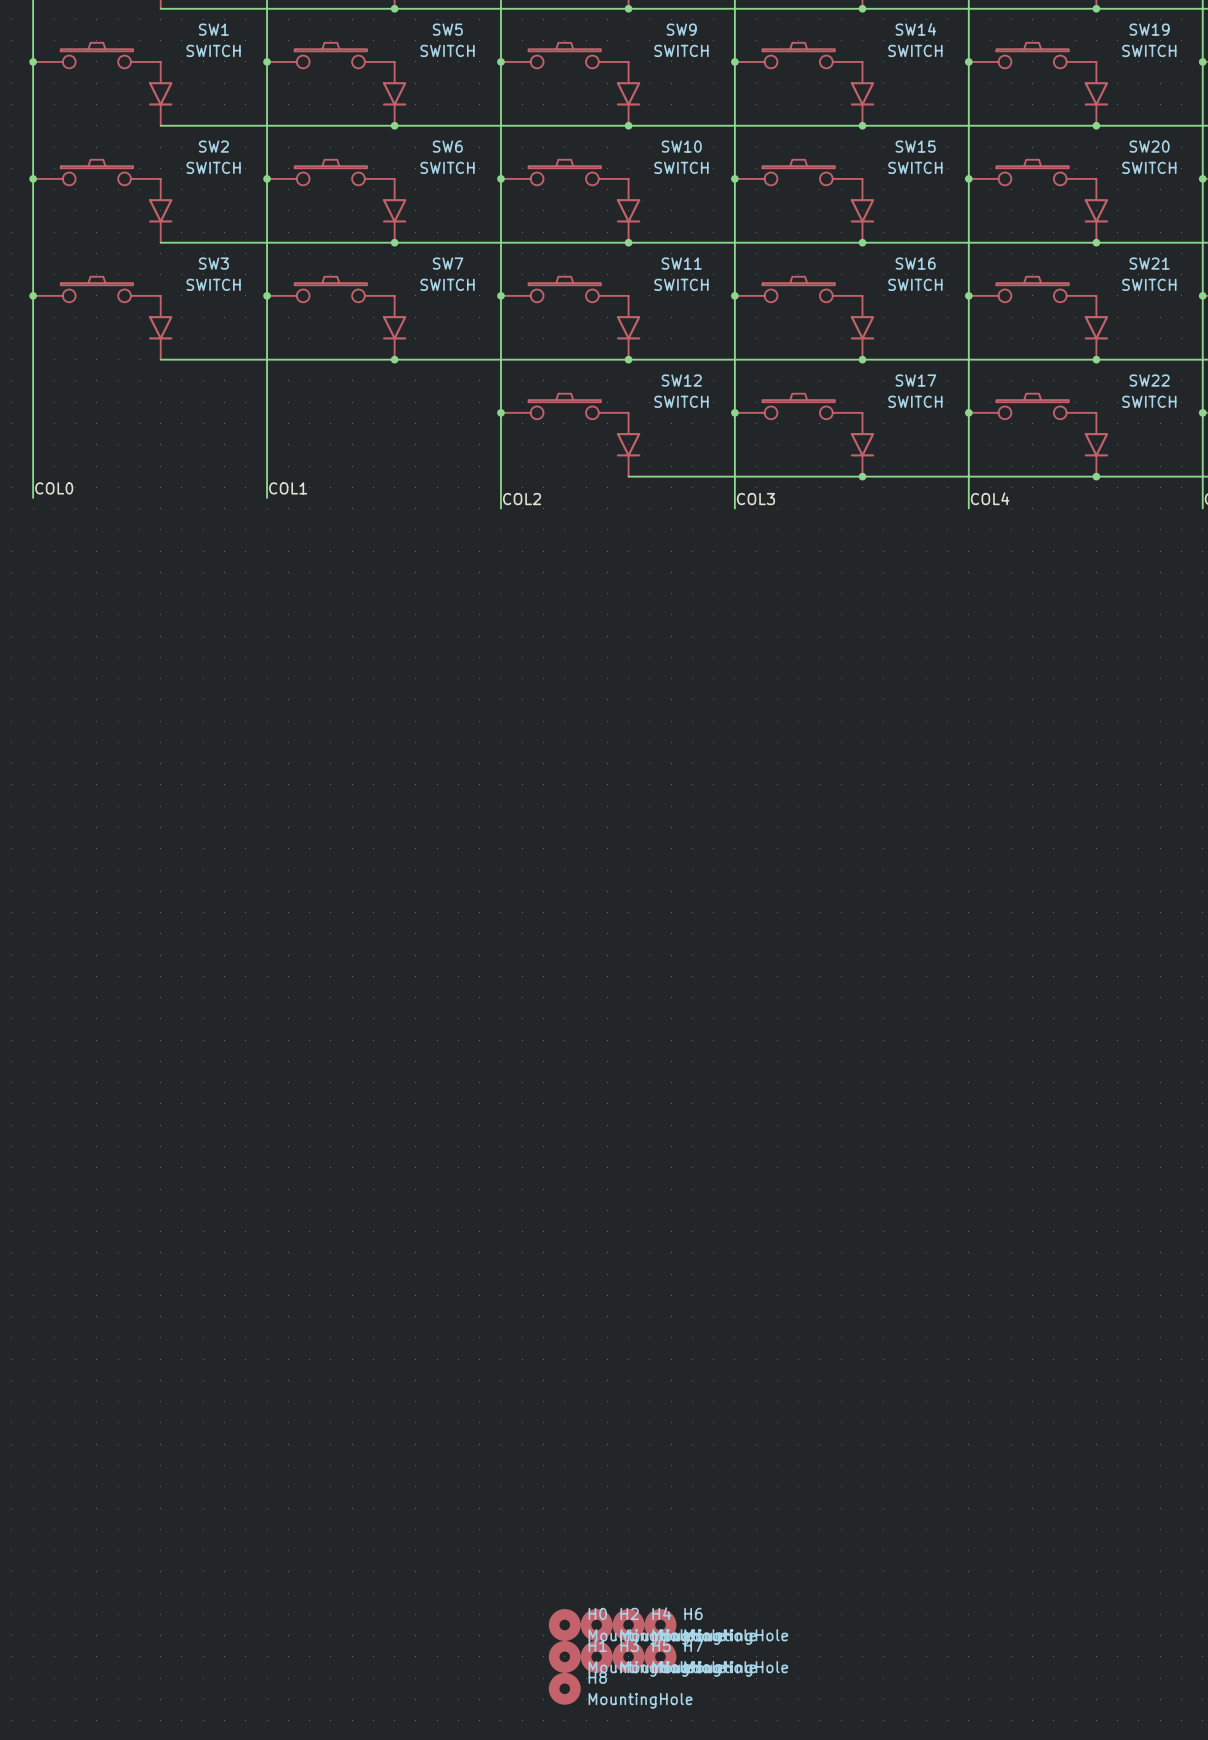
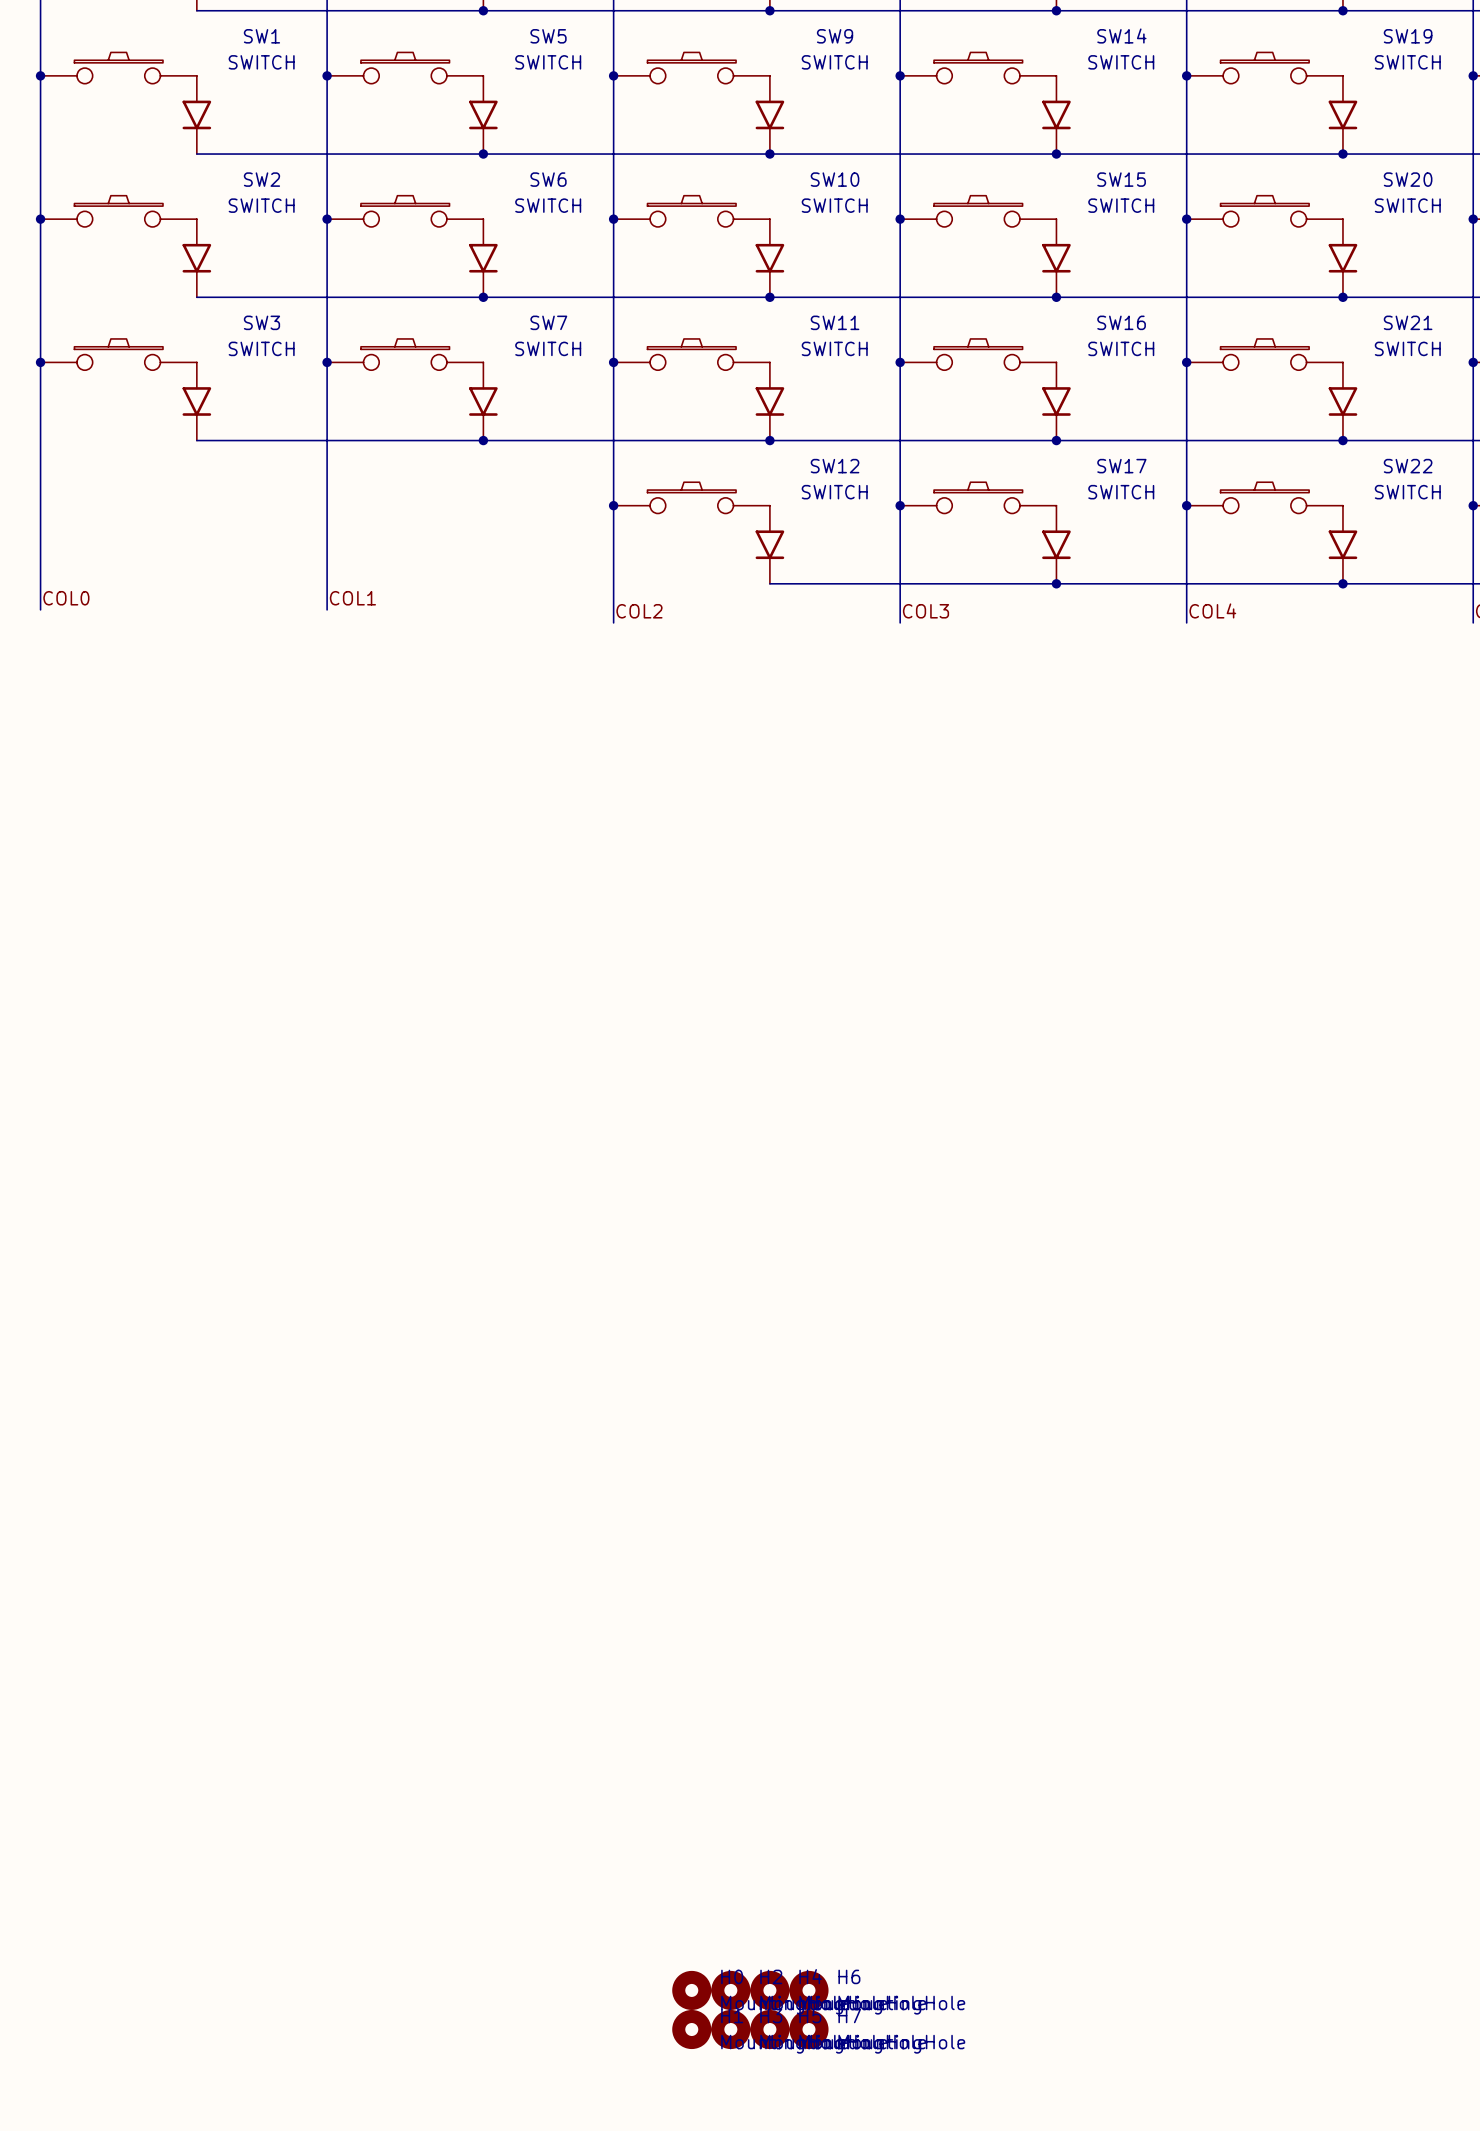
H8: MountingHole (564, 1688) -> none

